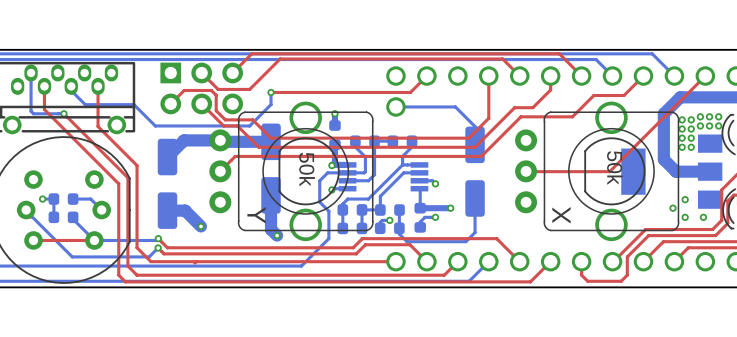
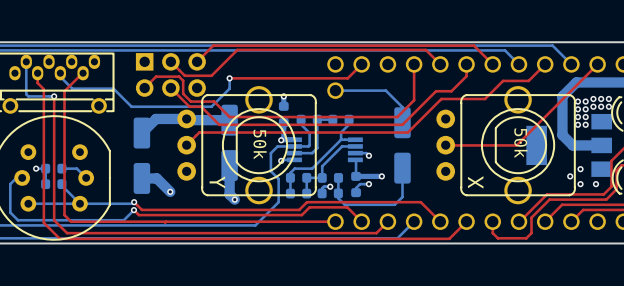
top track: (98, 86) (98, 126) (137, 165) (137, 247) (150, 261) -> (83, 73) (64, 91) (64, 215) (71, 221) (127, 221)
top track: (44, 97) (44, 109) (118, 183) (118, 275) (125, 281) -> (37, 83) (43, 89) (43, 222) (59, 238) (106, 238)
top track: (63, 113) (127, 177) (127, 266) (137, 275) -> (54, 96) (54, 220) (67, 233) (116, 233)
bottom track: (26, 210) (72, 256) (149, 256) -> (22, 177) (16, 177) (10, 184) (10, 212) (18, 220) (123, 220) (126, 217)
bottom track: none -> (28, 203) (79, 203)
top track: (33, 240) (94, 240) -> none

